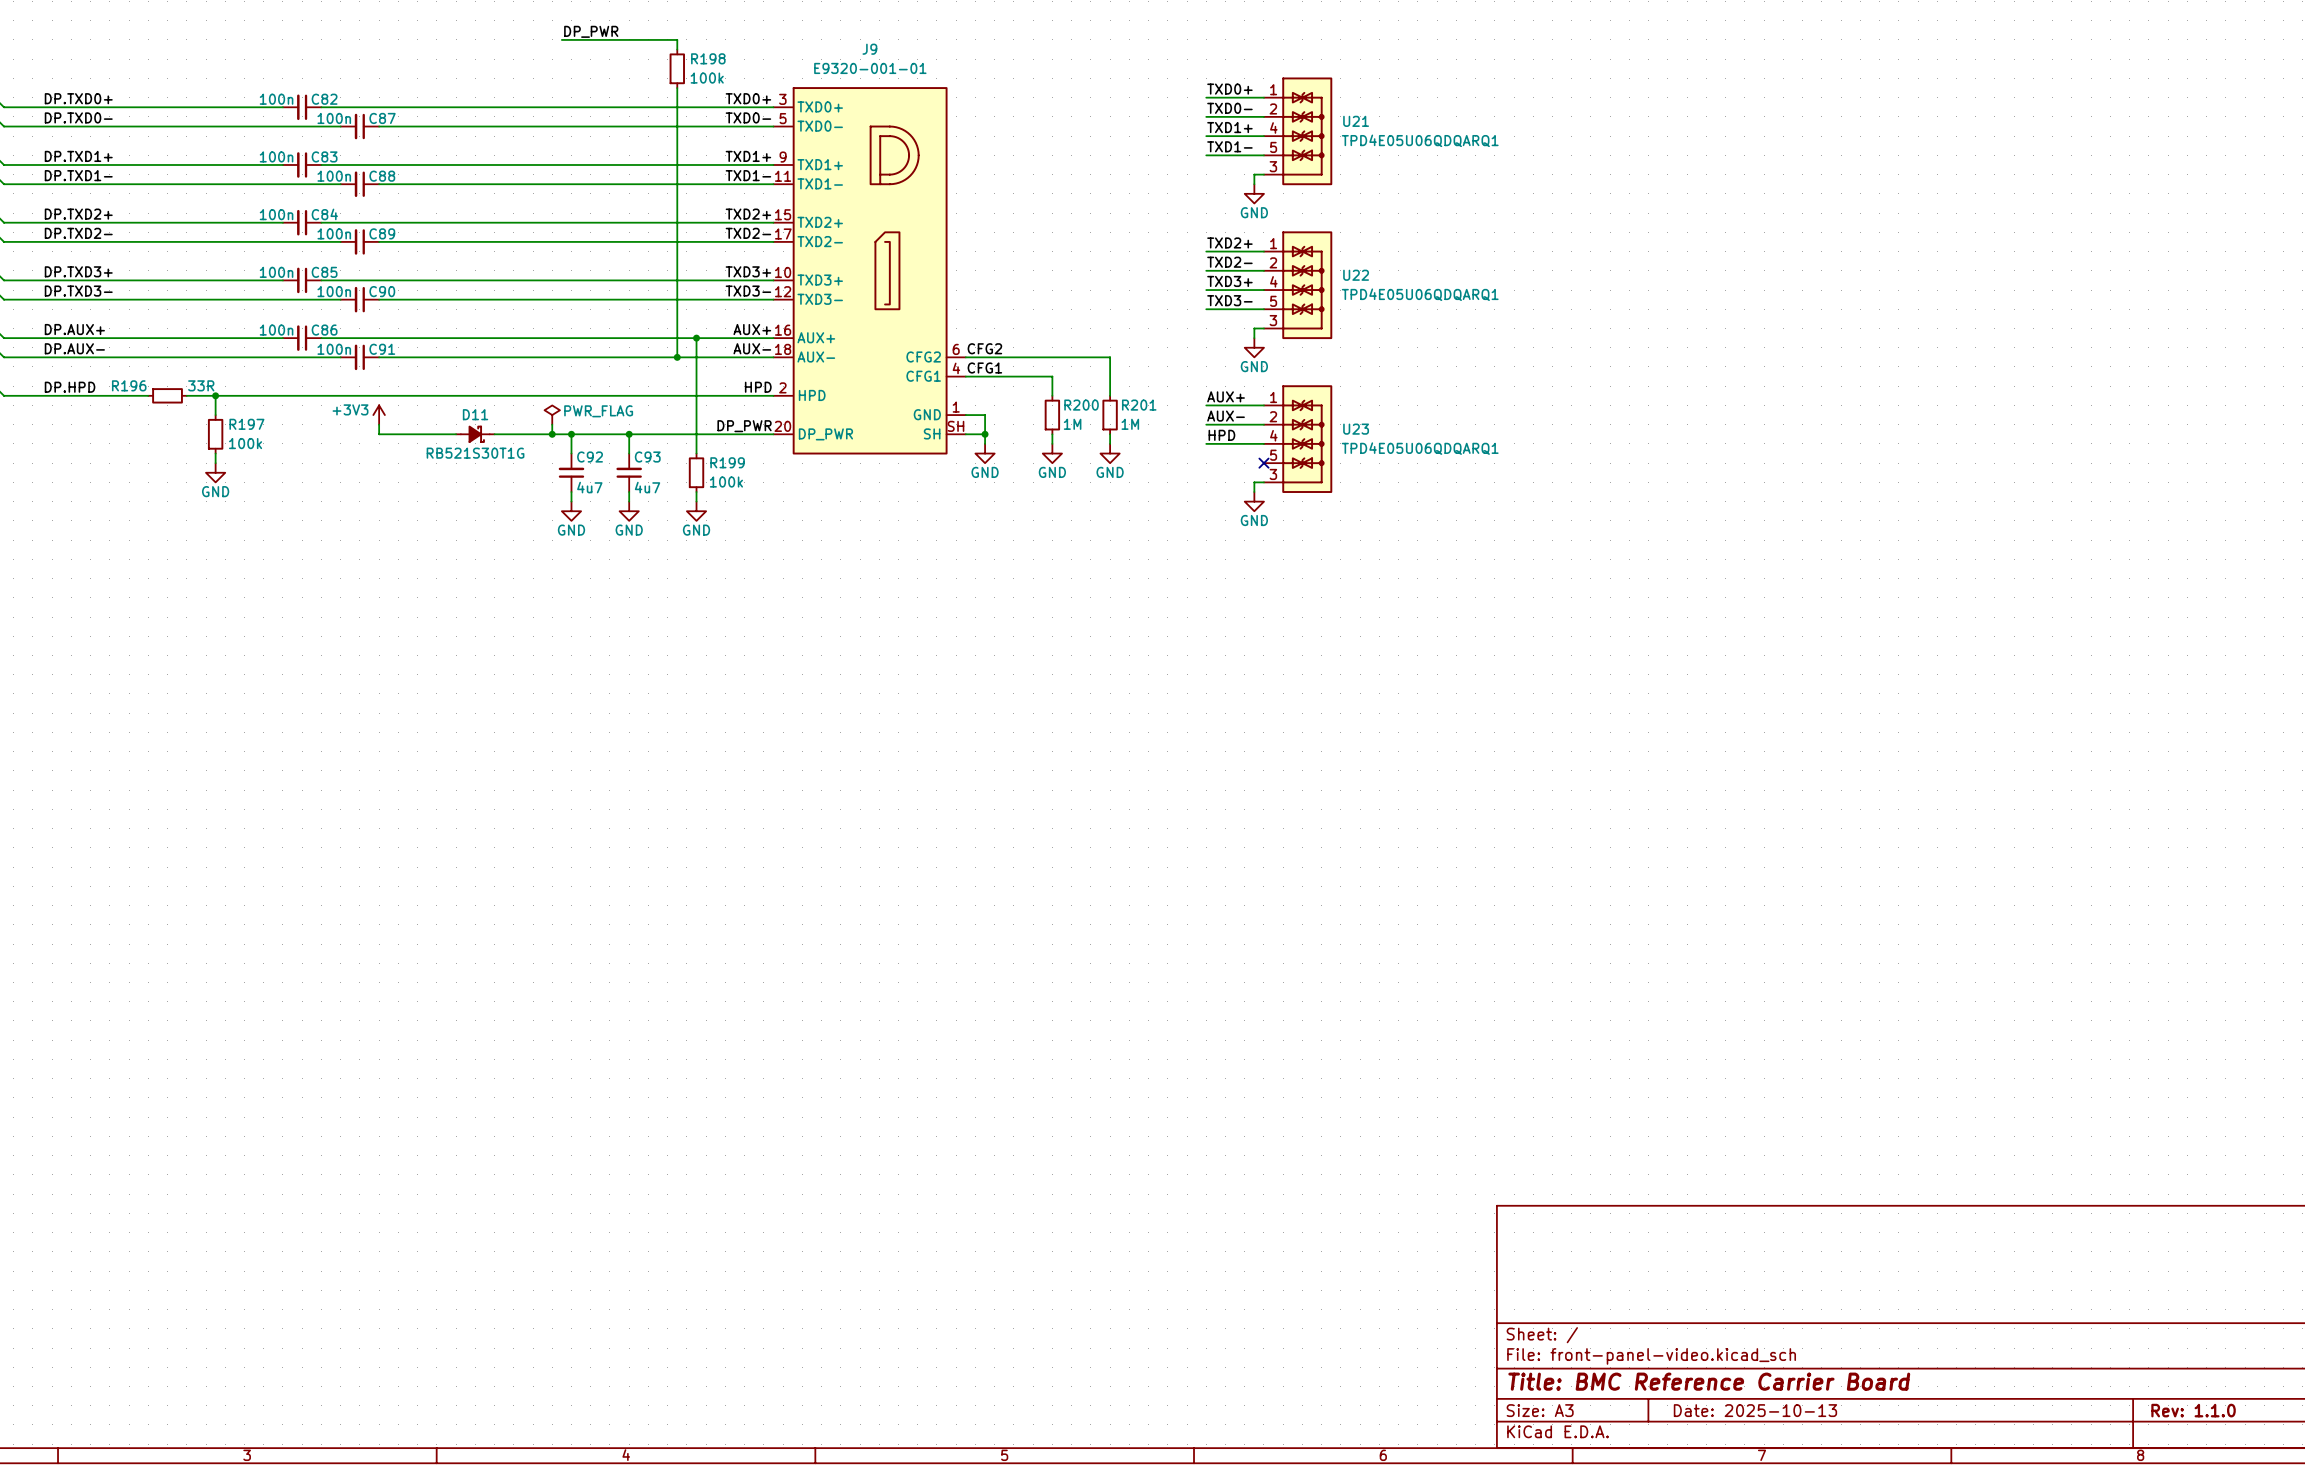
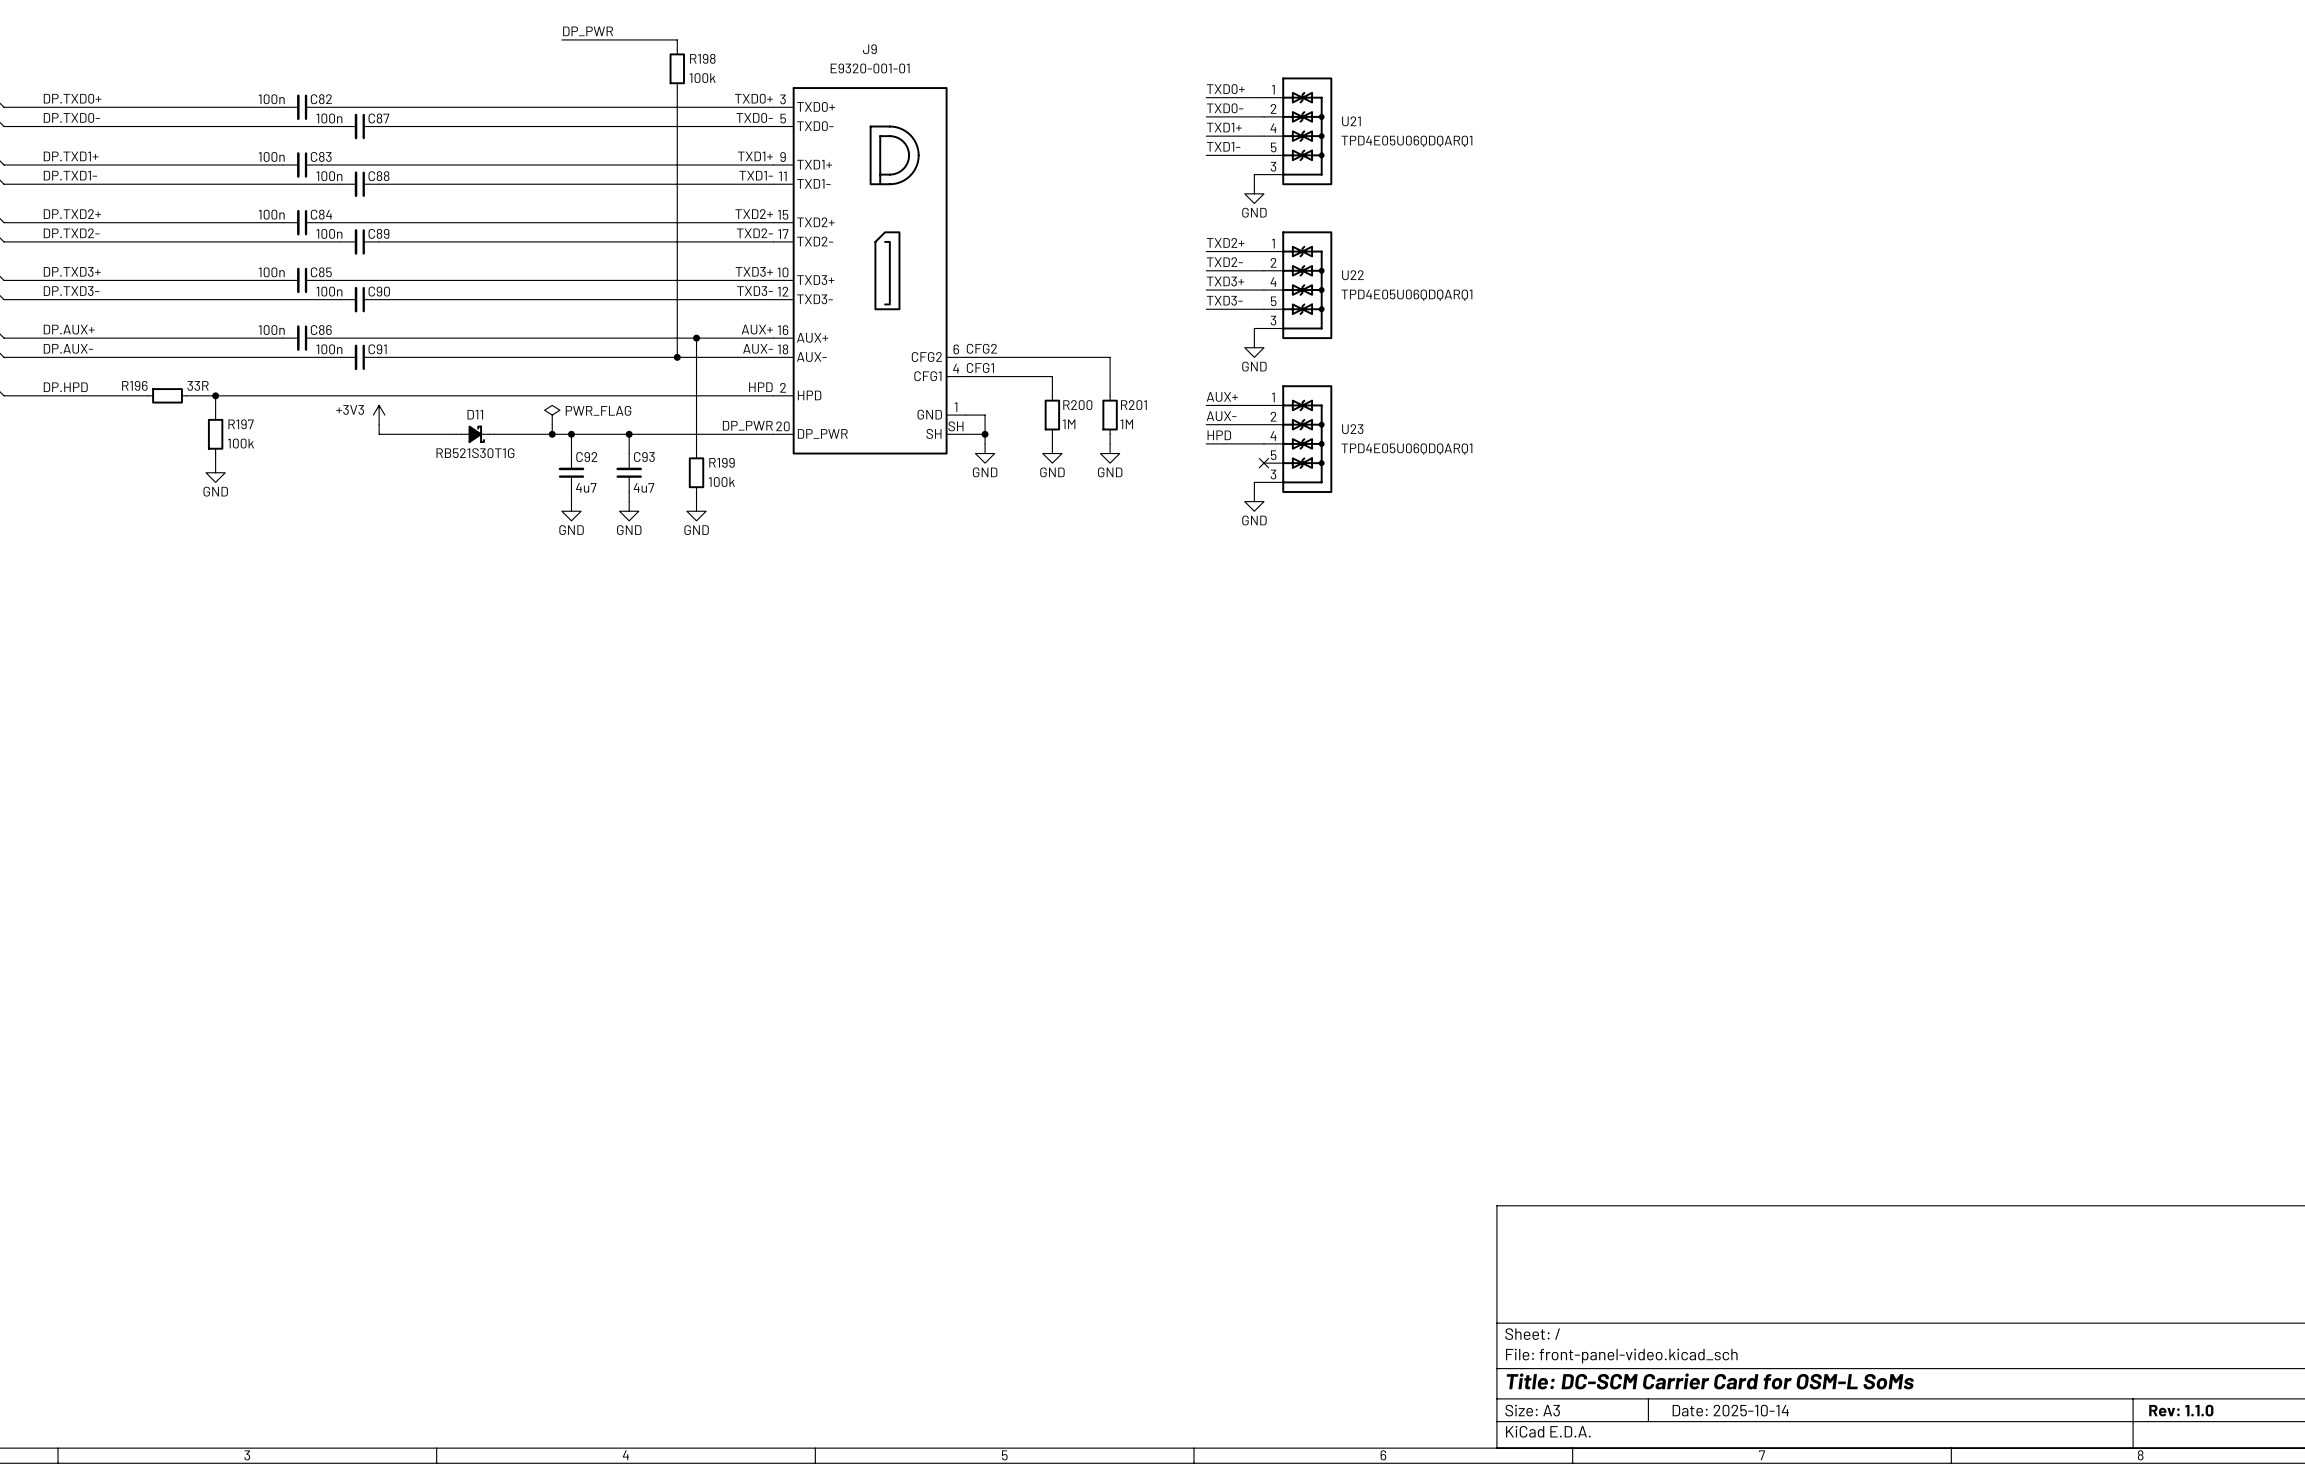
title block: Title: BMC Reference Carrier Board (1709, 1381) -> Title: DC-SCM Carrier Card for OSM-L SoMs (1710, 1381)
title block: Date: 2025-10-13 (1755, 1410) -> Date: 2025-10-14 (1730, 1410)

